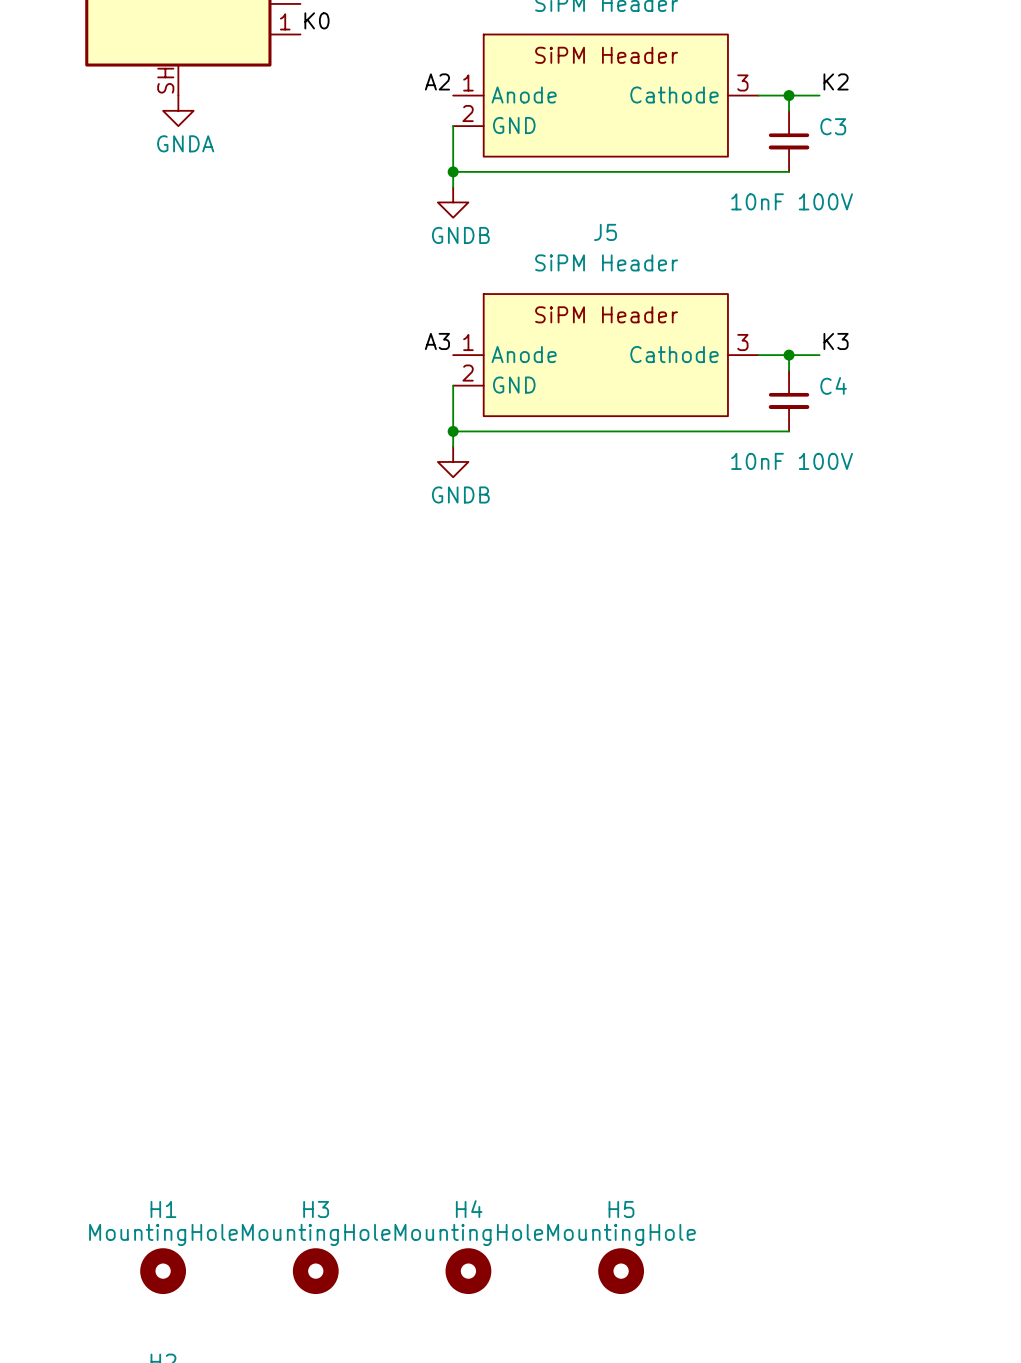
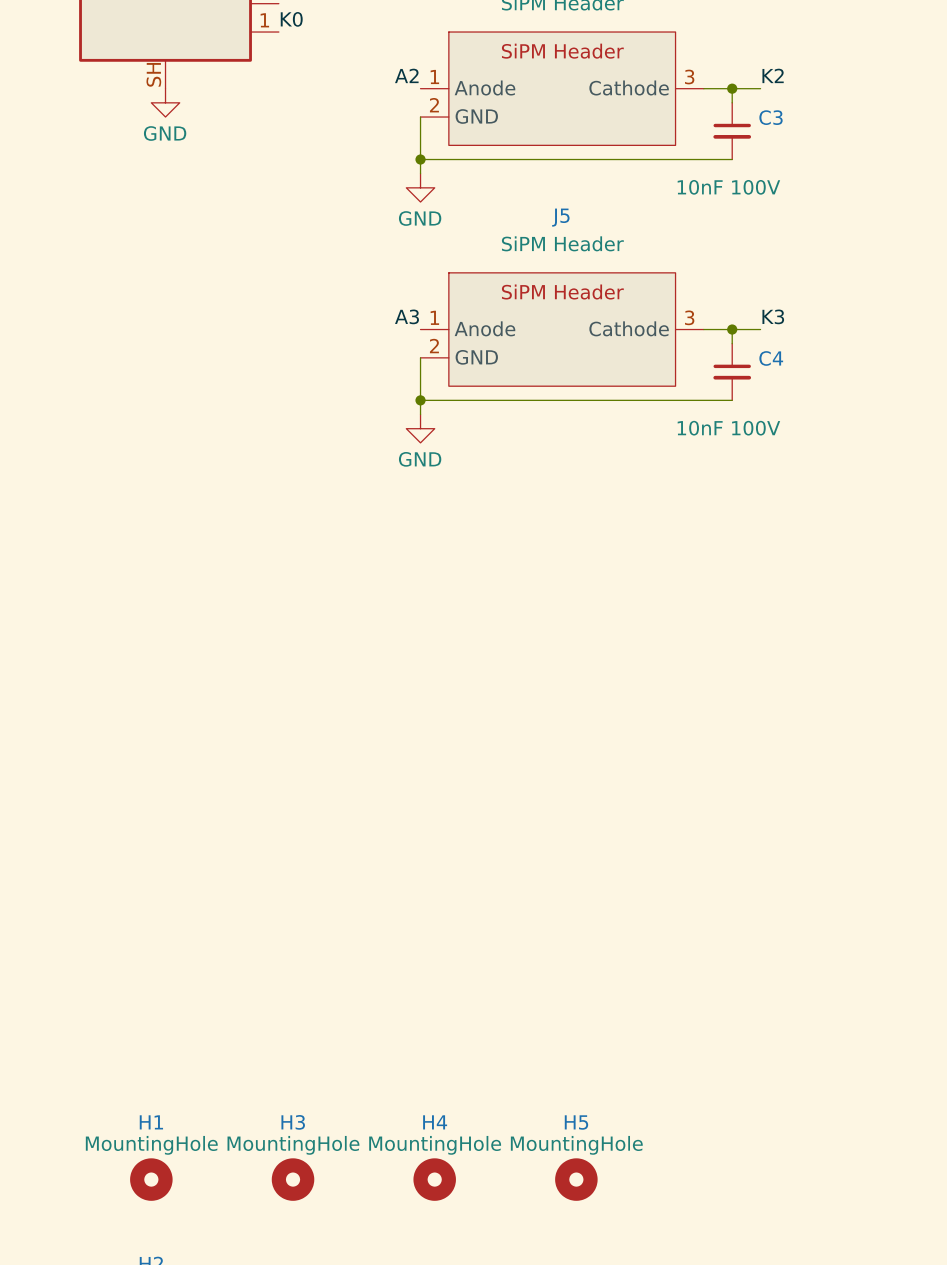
power symbol: GNDA (178, 110) -> GND (165, 102)
power symbol: GNDB (453, 202) -> GND (420, 187)
power symbol: GNDB (453, 461) -> GND (420, 428)

